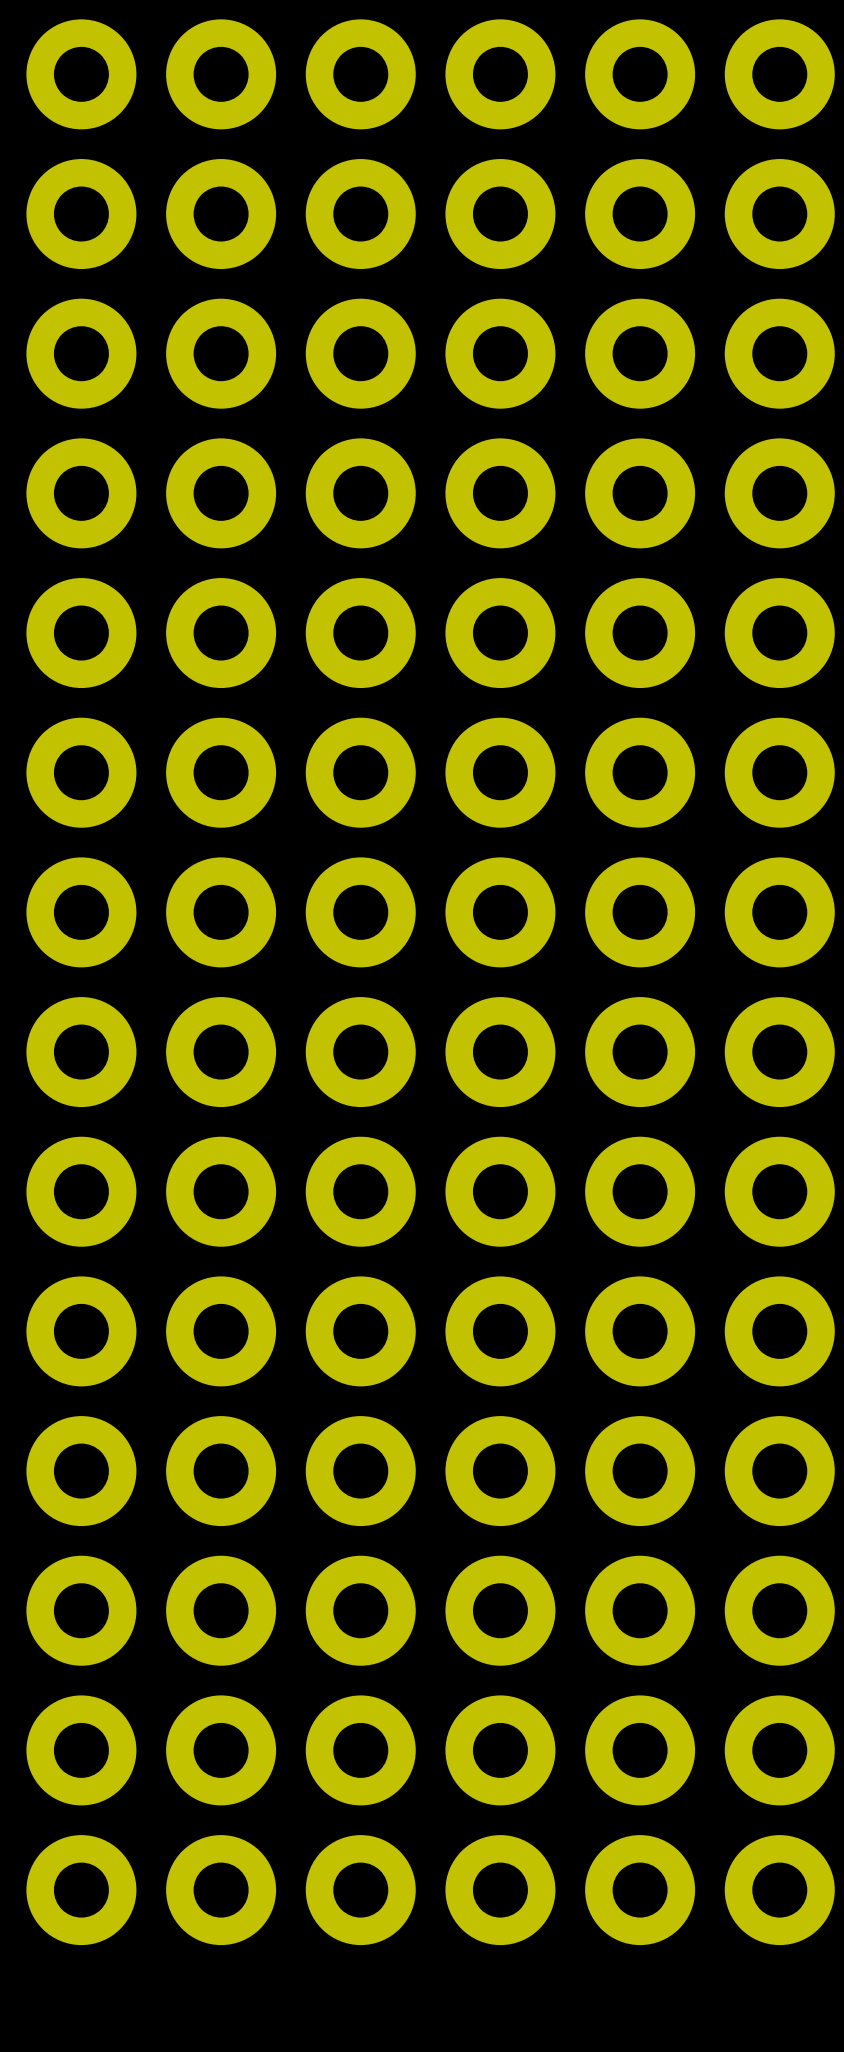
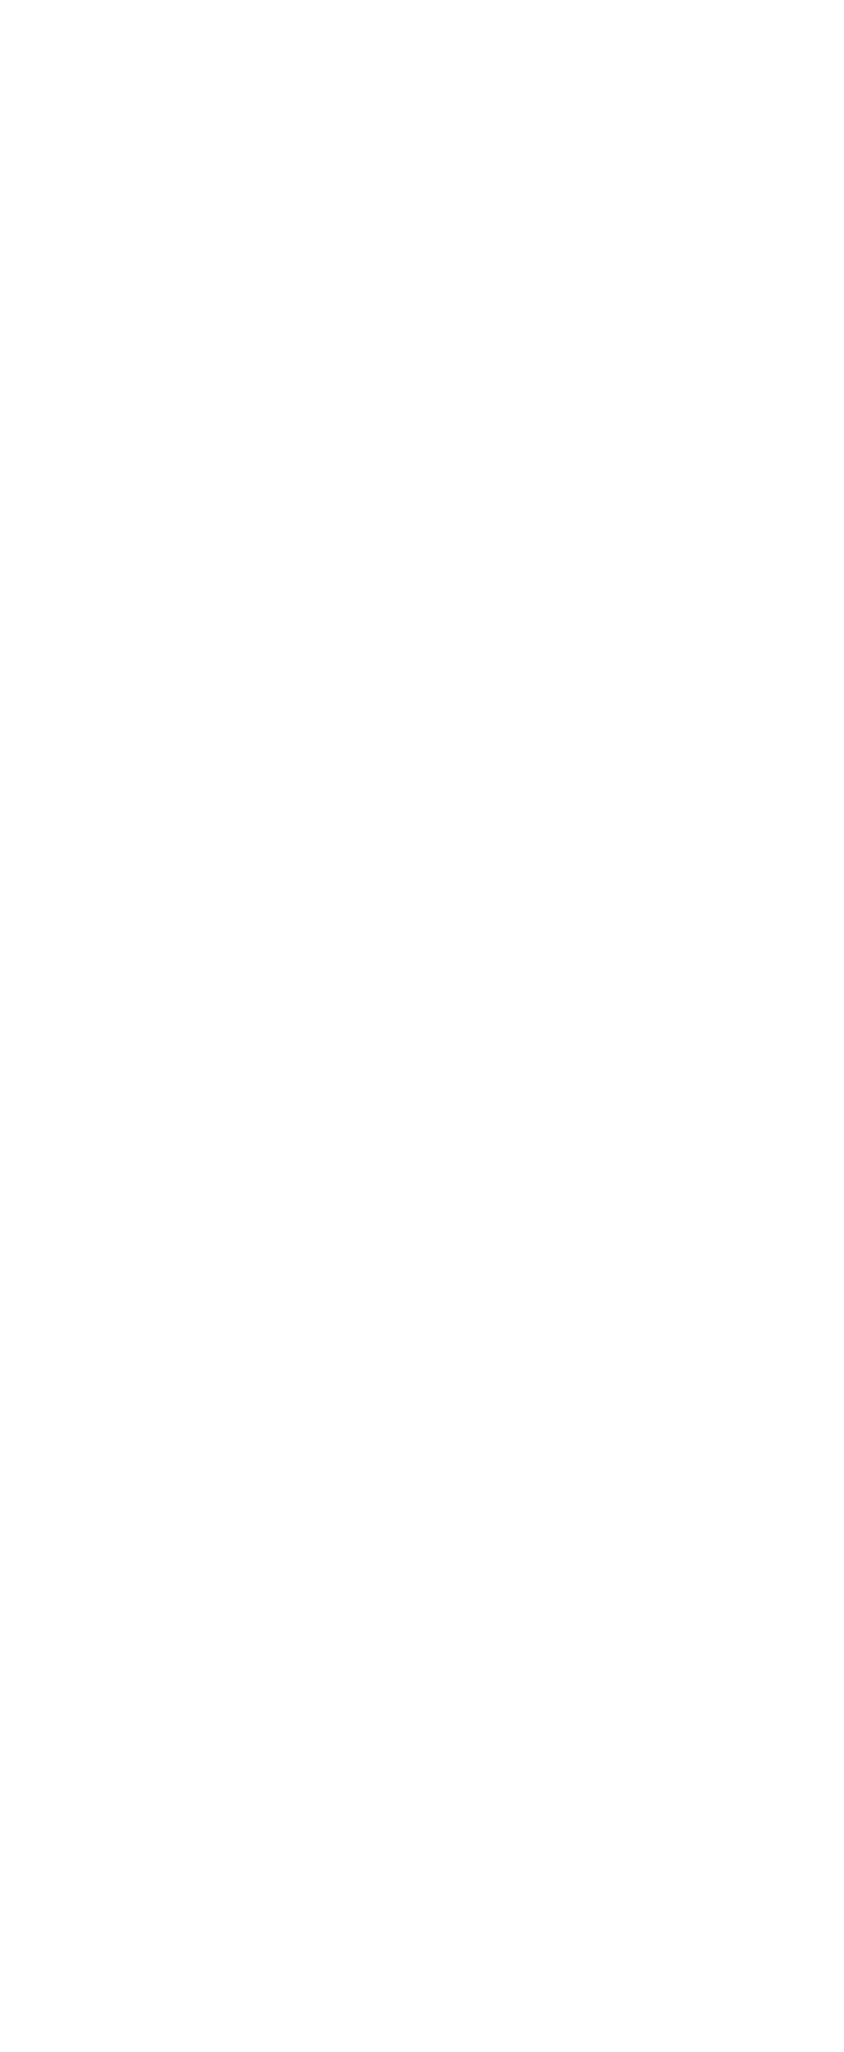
part: (81, 982) -> none
part: (221, 982) -> none
part: (360, 982) -> none
part: (500, 982) -> none
part: (640, 982) -> none
part: (779, 982) -> none

